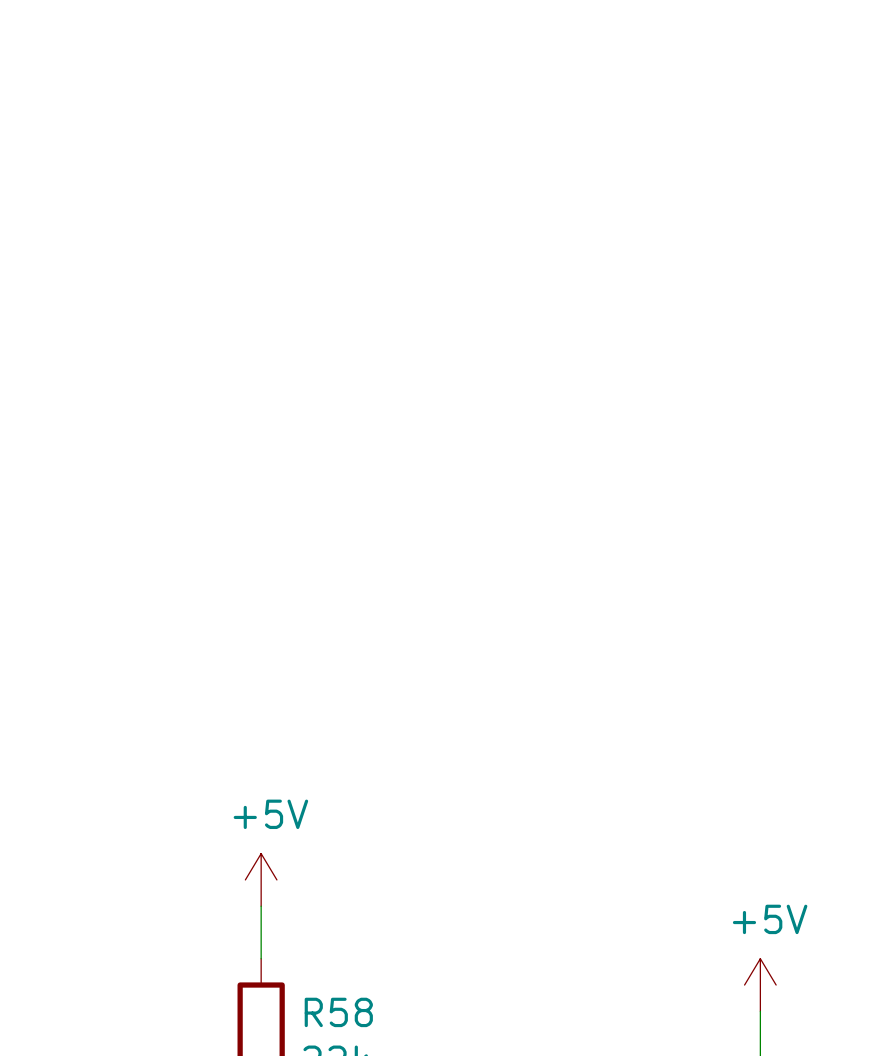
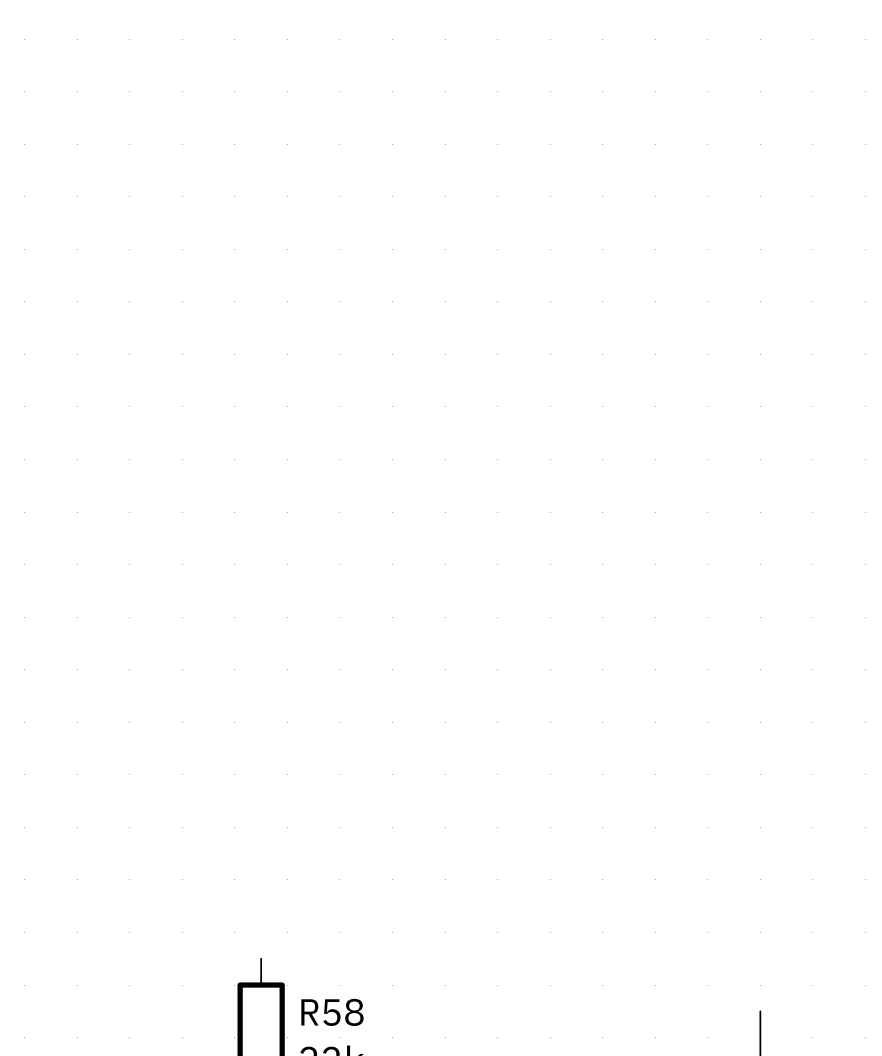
power symbol: +5V (261, 879) -> none
wire: (261, 906) (261, 958) -> none
power symbol: +5V (760, 985) -> none

